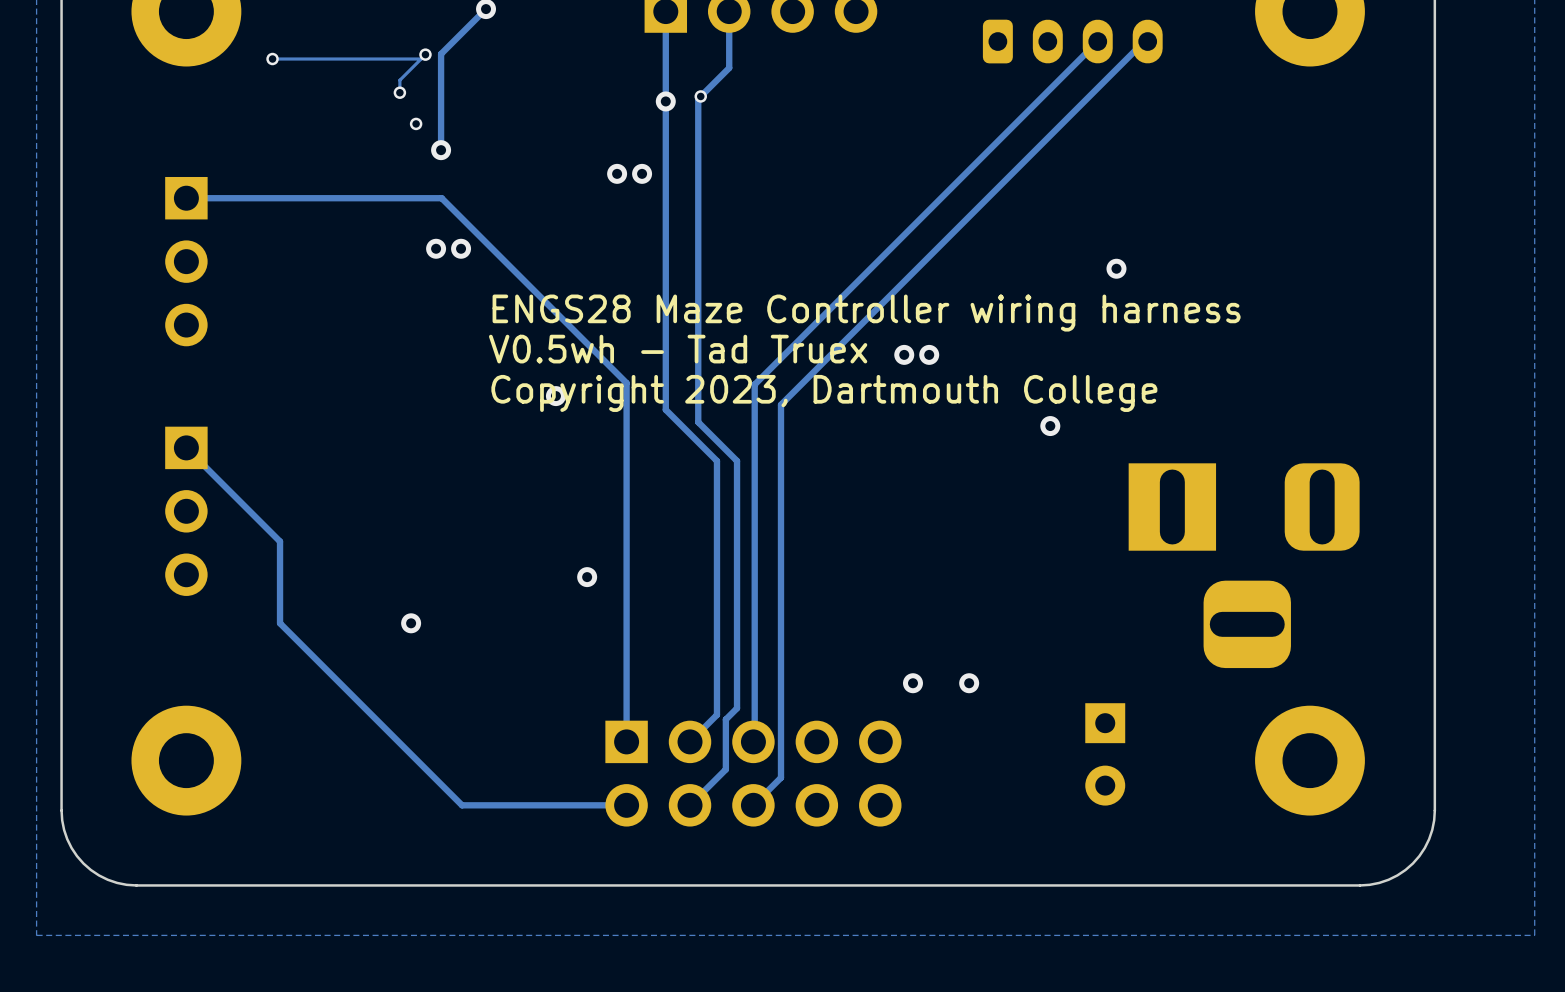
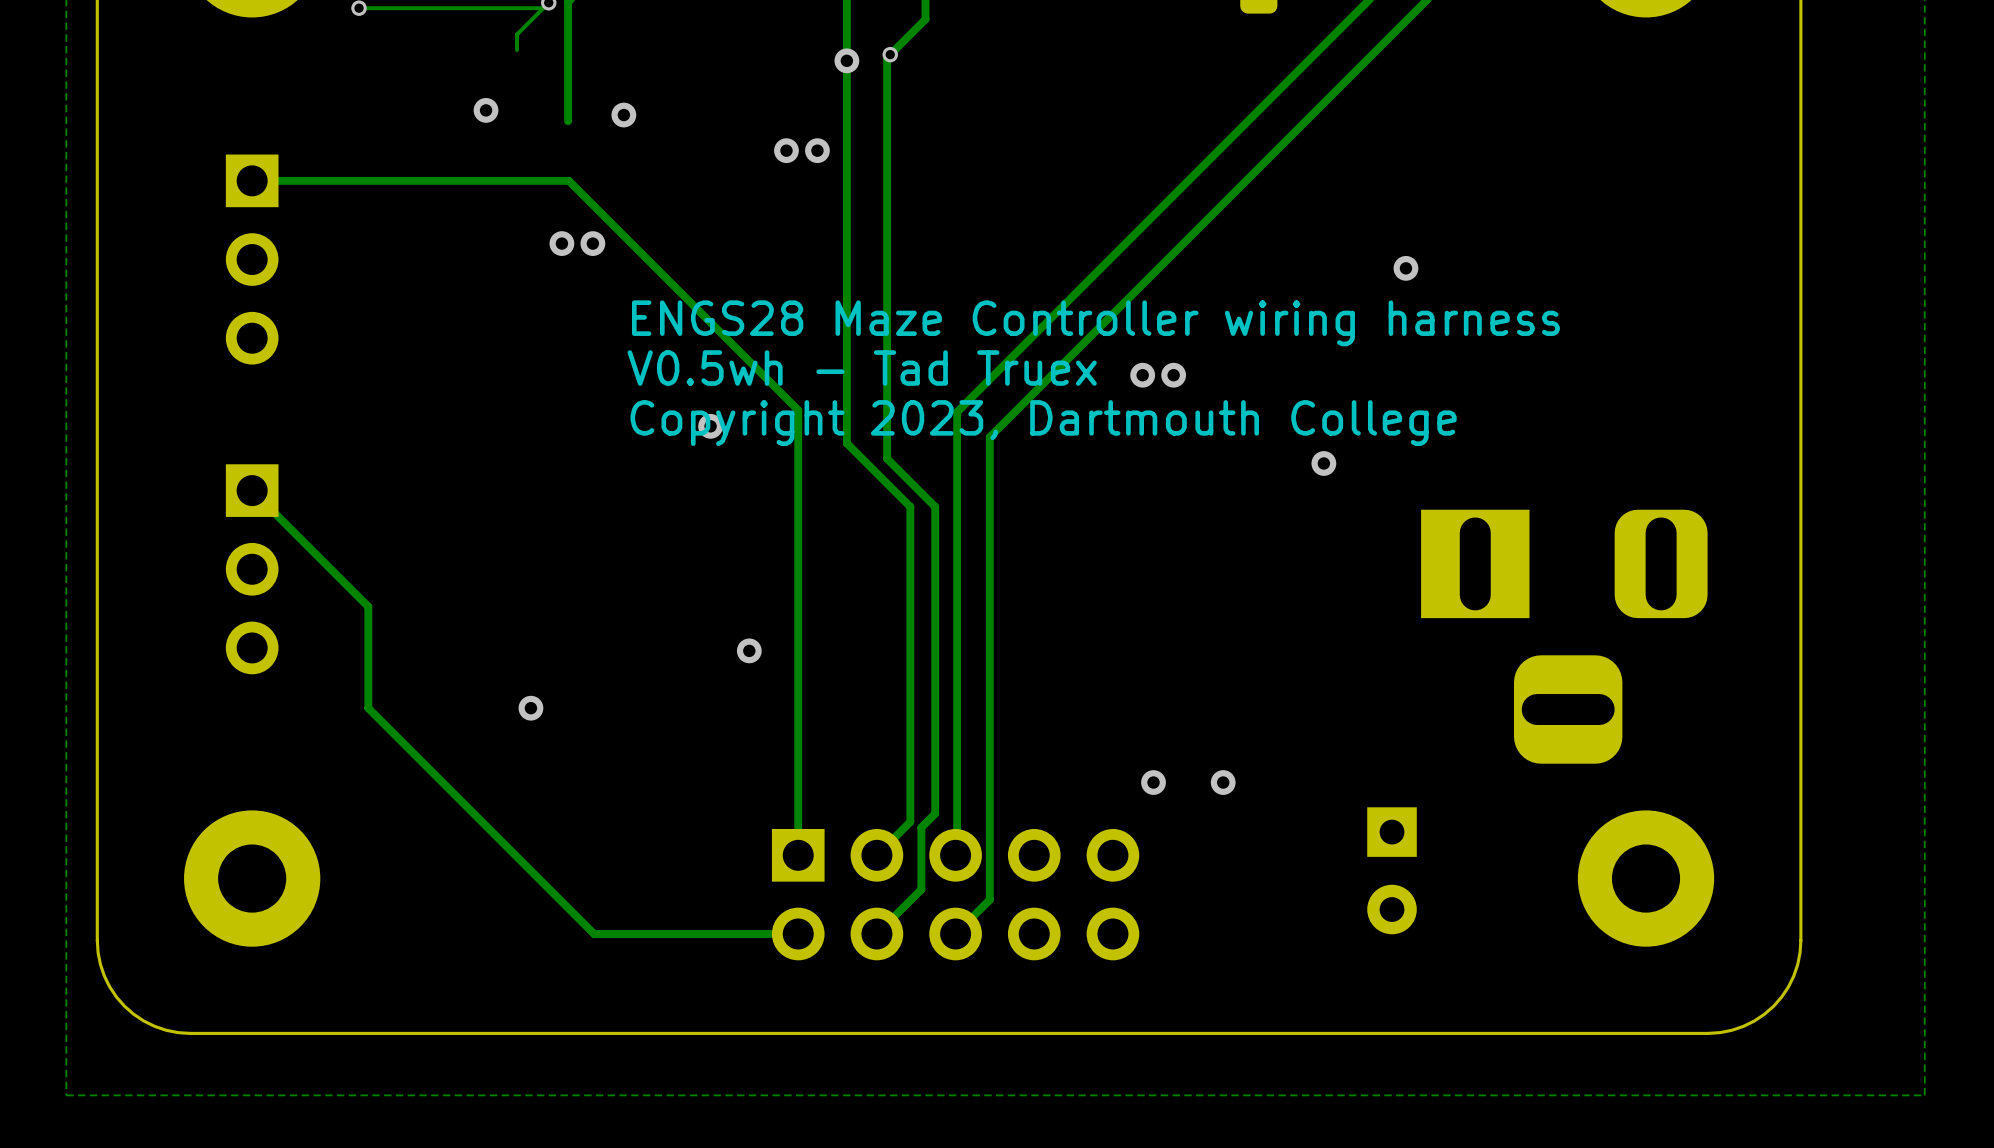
via: (399, 92) -> none
via: (416, 123) -> none
via: none -> (486, 110)
via: none -> (623, 115)
via: (441, 150) -> none

